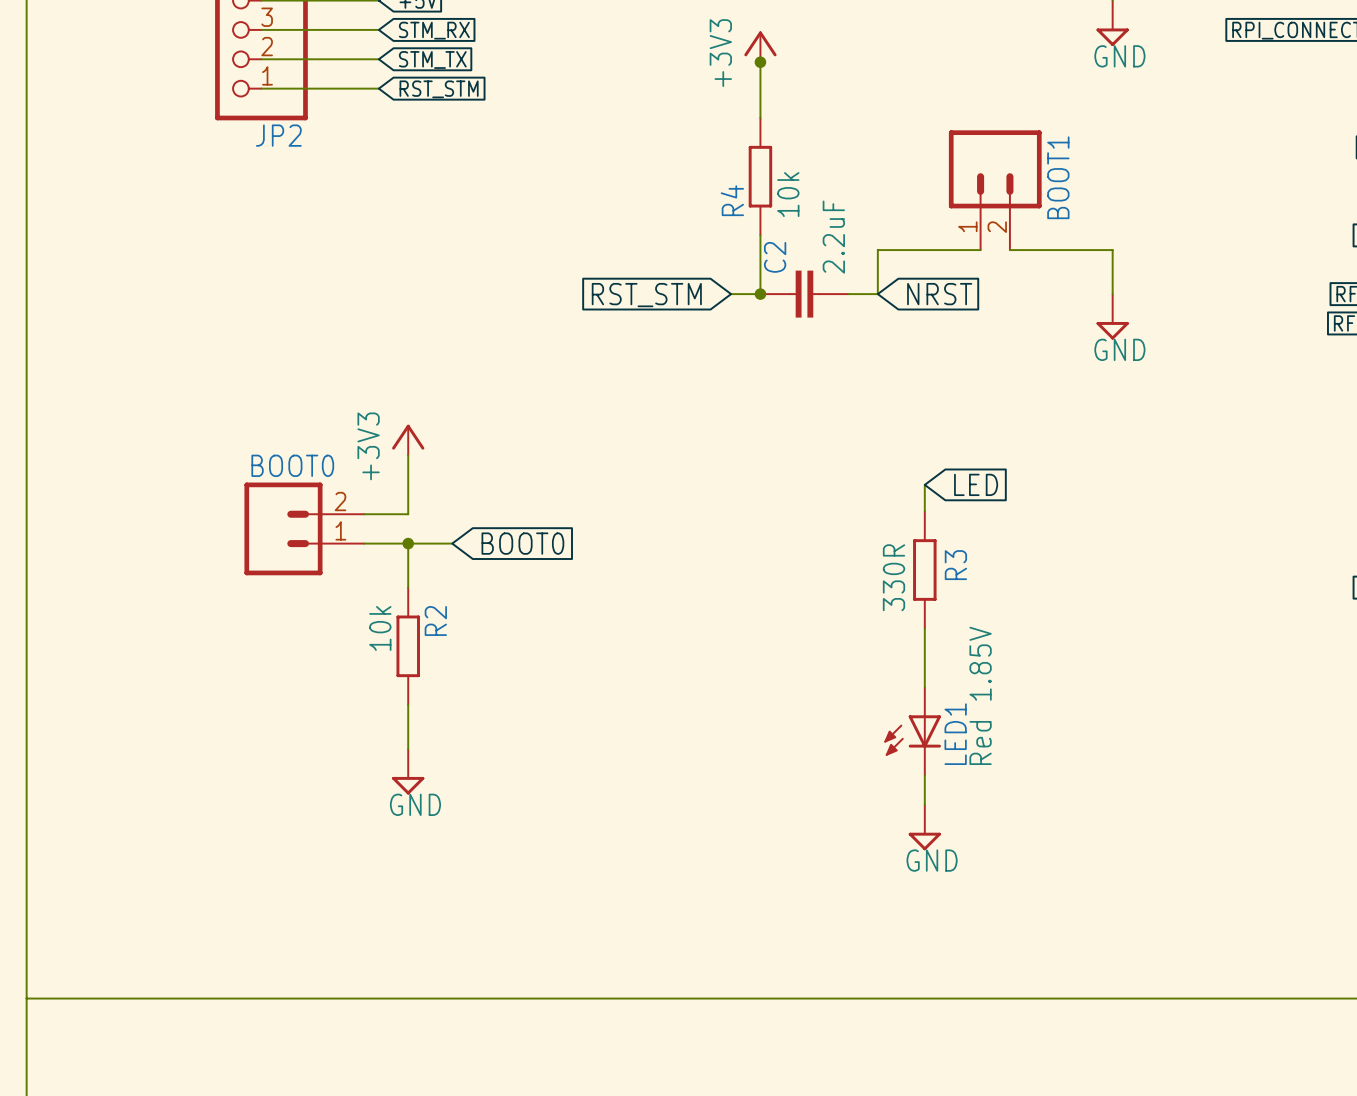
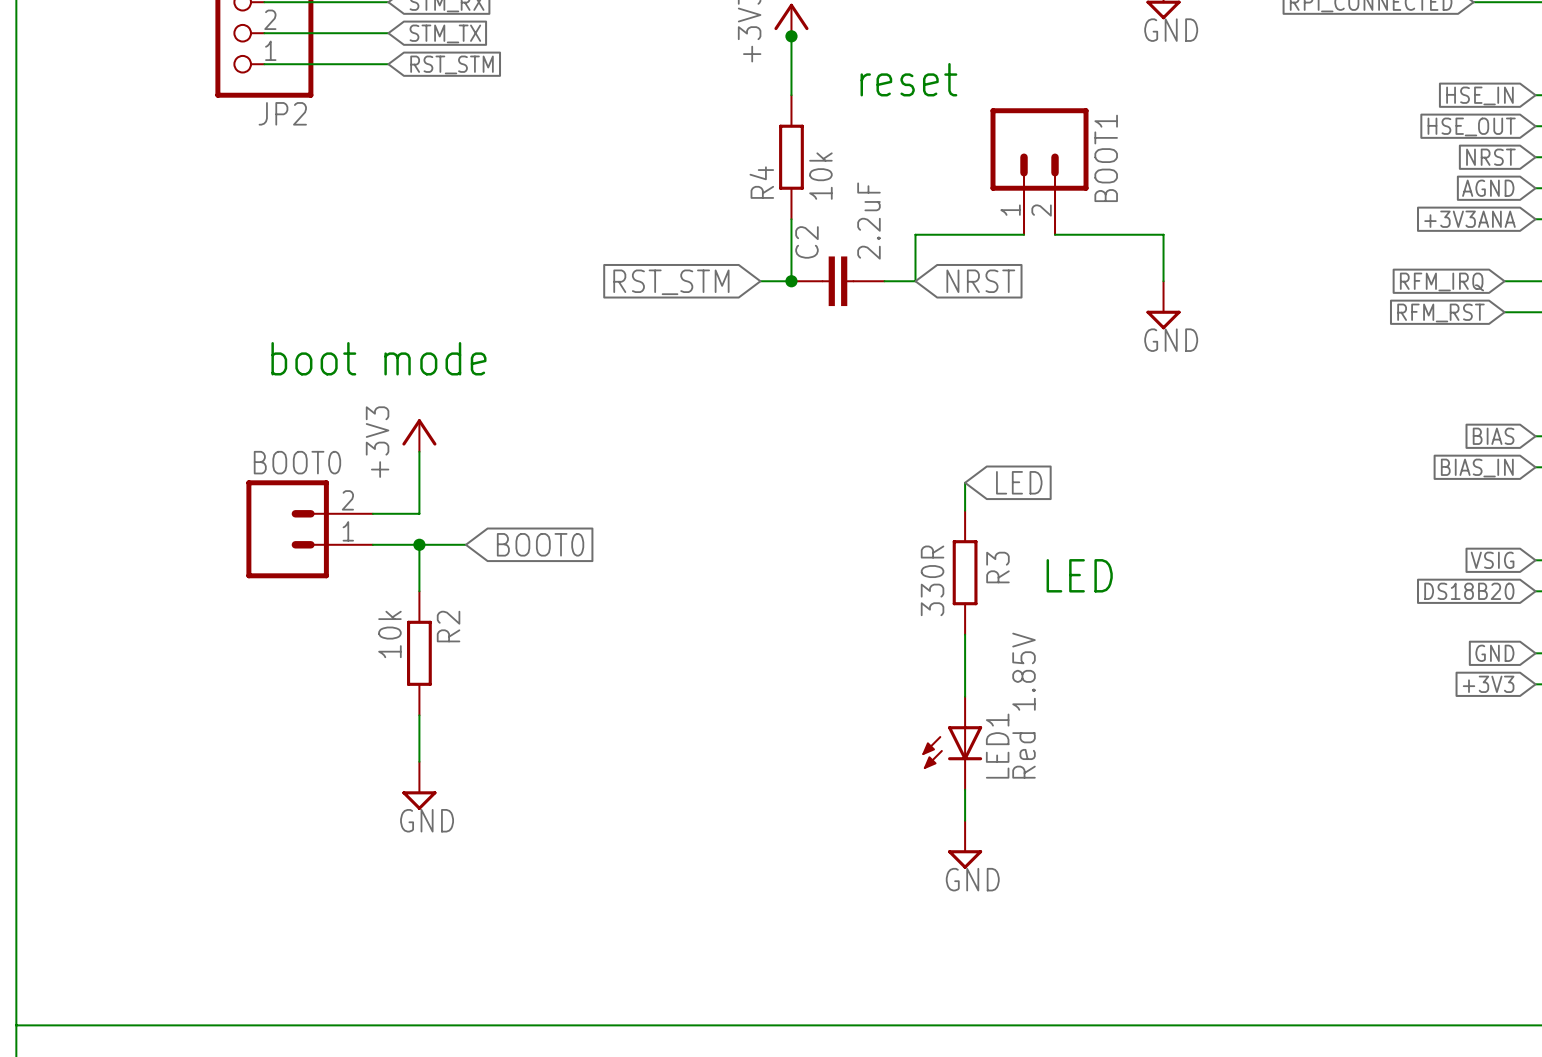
text: none -> reset (908, 79)
text: none -> boot mode (378, 358)
text: none -> LED (1079, 575)

